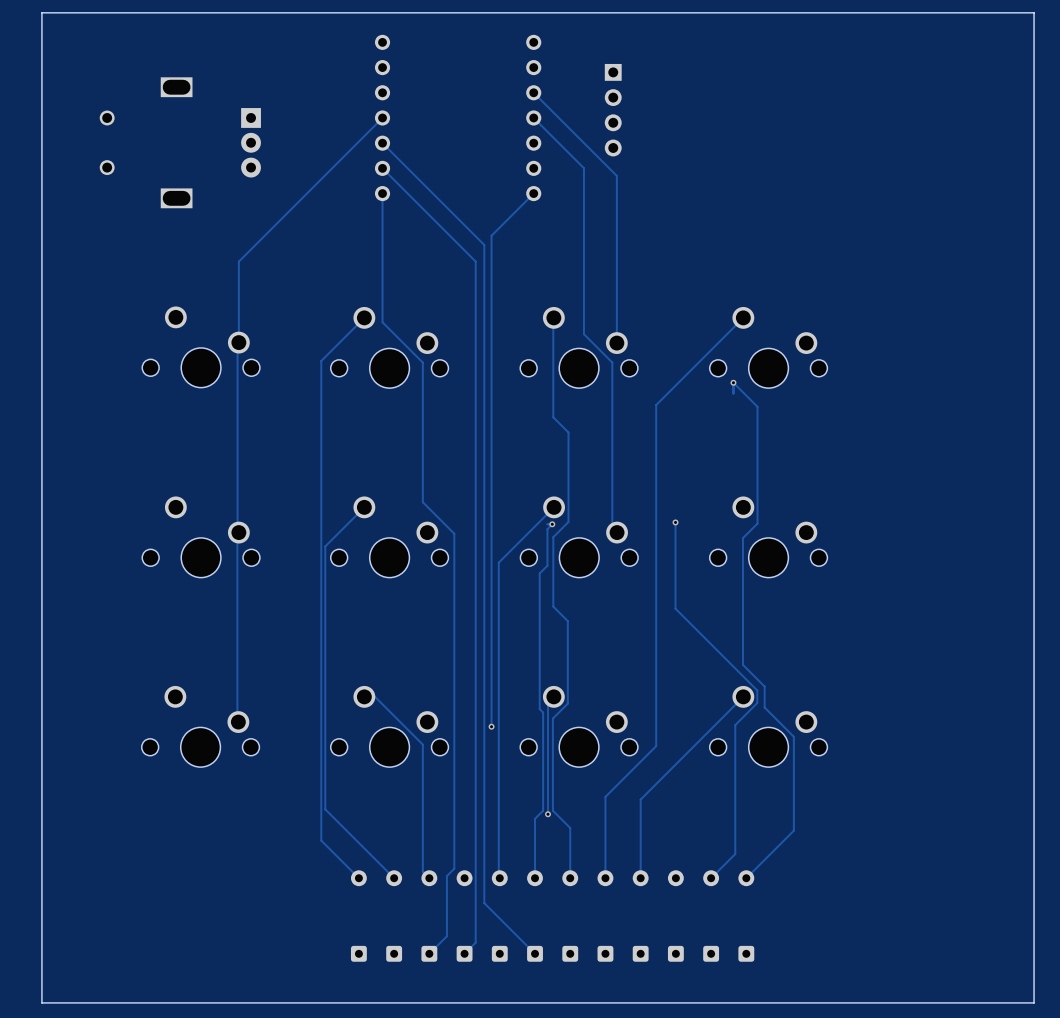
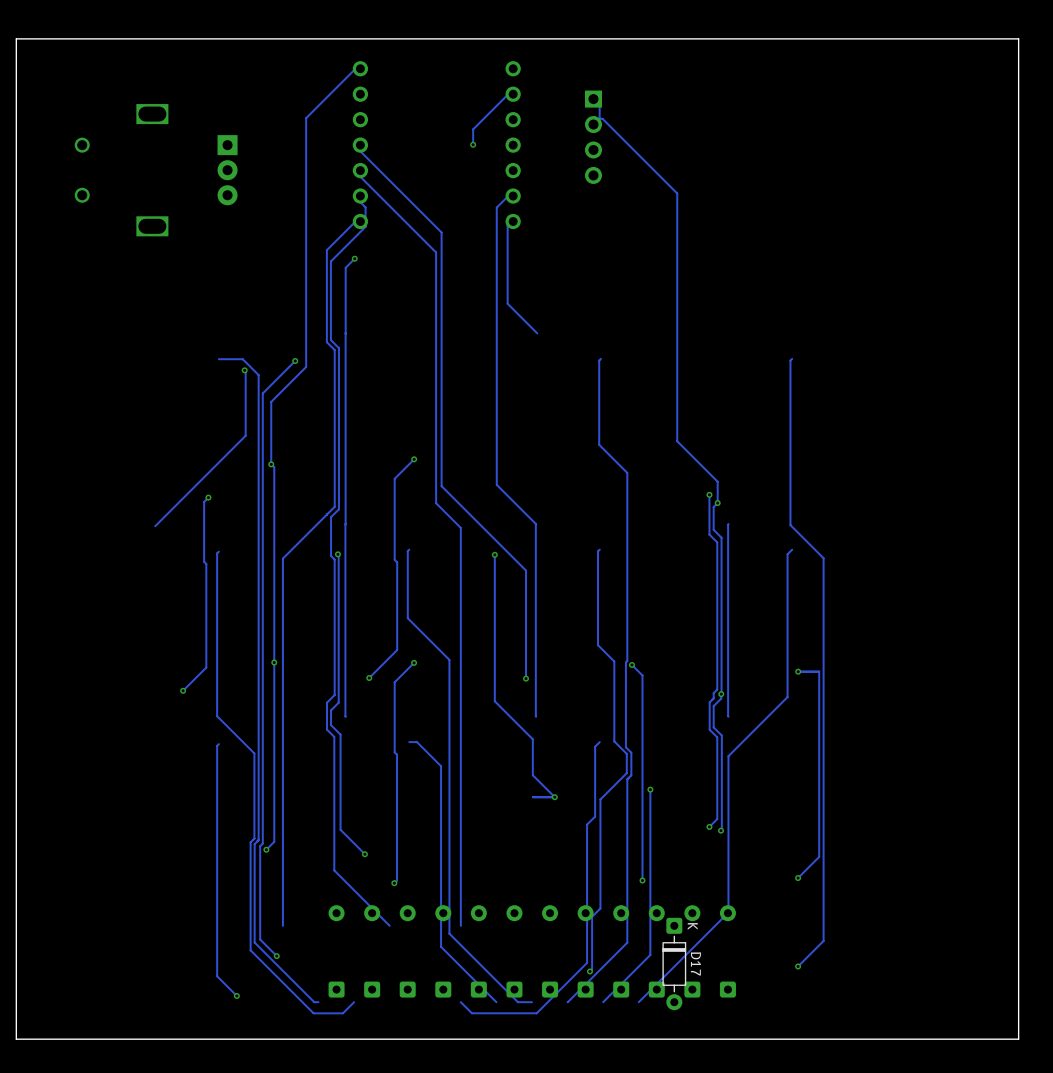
track: none -> (354, 69) (306, 118) (306, 367) (271, 401) (271, 464) (274, 467) (274, 841) (266, 849)
track: none -> (507, 94) (473, 129) (473, 144)
track: none -> (599, 107) (599, 118) (602, 118) (677, 193) (677, 441) (717, 481) (717, 503) (713, 507) (713, 529) (721, 537) (721, 693) (721, 698) (713, 706) (713, 727) (721, 735) (722, 830)
track: (533, 92) (616, 175) (616, 343) -> none
track: (382, 117) (238, 261) (238, 722) -> none
via: none -> (473, 144)
track: (533, 117) (583, 168) (583, 334) (612, 362) (612, 527) (617, 532) -> none
track: none -> (354, 145) (441, 232) (441, 486) (526, 570) (526, 678)
track: none -> (354, 171) (436, 252) (436, 503) (460, 527) (460, 925)
track: (382, 143) (484, 244) (484, 903) (535, 953) -> none
track: (382, 168) (475, 261) (475, 942) (464, 953) -> none
track: none -> (354, 196) (365, 207) (365, 226) (330, 261) (330, 340) (338, 348) (338, 509) (331, 517) (331, 555) (334, 559) (334, 695) (327, 702) (327, 729) (334, 736) (334, 870) (389, 925)
track: none -> (507, 196) (496, 207) (496, 484) (536, 524) (536, 716)
track: (382, 193) (382, 322) (422, 362) (422, 502) (454, 533) (454, 868) (446, 876) (446, 936) (429, 953) -> none
track: (533, 193) (491, 235) (491, 726) -> none
track: none -> (354, 222) (326, 250) (326, 342) (334, 350) (334, 506) (282, 558) (282, 925)
track: none -> (507, 222) (507, 303) (537, 333)
track: none -> (354, 258) (345, 267) (345, 333)
via: none -> (354, 258)
track: none -> (345, 333) (345, 524)
track: (364, 317) (321, 360) (321, 840) (358, 878) -> none
track: (553, 317) (553, 417) (568, 432) (568, 522) (553, 537) (553, 606) (567, 621) (567, 703) (552, 718) (552, 810) (570, 828) (570, 878) -> none
track: (743, 317) (656, 405) (656, 746) (605, 796) (605, 878) -> none
track: none -> (218, 359) (242, 359) (258, 375) (258, 840) (254, 844) (254, 942) (314, 1002) (318, 1002)
track: none -> (600, 358) (599, 360) (599, 444) (627, 472) (625, 747) (631, 752) (631, 775) (627, 779) (627, 942) (567, 1002)
track: none -> (792, 358) (790, 360) (790, 525) (823, 558) (823, 940) (798, 966)
track: none -> (295, 360) (262, 393) (262, 843) (260, 846) (260, 939) (276, 956)
via: none -> (295, 360)
track: none -> (244, 370) (245, 435) (155, 526)
via: none -> (244, 370)
part: (201, 347) -> none
part: (389, 347) -> none
part: (579, 347) -> none
part: (768, 347) -> none
via: (733, 382) -> none
track: (733, 393) (733, 382) (757, 406) (757, 523) (742, 538) (742, 664) (764, 686) (764, 707) (793, 736) (793, 830) (746, 878) -> none
track: none -> (414, 459) (394, 478) (397, 650) (369, 678)
via: none -> (414, 459)
via: none -> (271, 464)
track: none -> (709, 494) (709, 534) (717, 542) (717, 689) (709, 702) (709, 729) (717, 737) (717, 819) (709, 826)
via: none -> (709, 494)
track: none -> (208, 497) (204, 501) (206, 667) (183, 690)
via: none -> (208, 497)
via: none -> (717, 503)
track: none -> (345, 524) (345, 716)
track: none -> (728, 524) (728, 716)
track: (364, 507) (325, 546) (325, 809) (394, 878) -> none
track: (554, 507) (498, 562) (499, 878) -> none
track: none -> (409, 549) (407, 618) (449, 659) (449, 933) (517, 1002) (532, 1002)
track: none -> (599, 549) (598, 551) (598, 645) (614, 661) (614, 741) (626, 753) (626, 773) (600, 799) (600, 908) (592, 916) (592, 969) (589, 971)
track: none -> (792, 549) (787, 554) (787, 697) (728, 756) (728, 912) (638, 1002)
track: none -> (218, 551) (217, 553) (217, 716) (254, 753) (254, 838) (250, 842) (250, 950) (313, 1013) (342, 1013) (354, 1002)
track: (675, 522) (675, 608) (757, 690) (757, 703) (735, 725) (735, 854) (711, 878) -> none
via: (675, 522) -> none
via: none -> (337, 554)
track: none -> (338, 554) (338, 702) (331, 710) (331, 725) (340, 734) (340, 829) (364, 854)
track: none -> (494, 554) (494, 701) (532, 739) (532, 775) (554, 797) (532, 797)
track: (547, 524) (552, 524) (547, 529) (547, 565) (539, 573) (539, 709) (543, 712) (543, 810) (535, 818) (535, 878) -> none
via position: (552, 524) -> (494, 554)
part: (201, 537) -> none
part: (389, 537) -> none
part: (579, 537) -> none
part: (768, 537) -> none
via: none -> (274, 662)
track: none -> (414, 662) (394, 682) (397, 880) (394, 883)
via: none -> (414, 662)
track: none -> (631, 664) (642, 675) (642, 880)
via: none -> (631, 664)
track: none -> (798, 671) (819, 671) (819, 856) (798, 878)
via: none -> (798, 671)
via: none -> (369, 678)
via: none -> (526, 678)
via: none -> (183, 690)
via: none -> (721, 694)
track: (364, 696) (375, 696) (422, 744) (422, 871) (429, 878) -> none
track: (553, 696) (548, 702) (548, 814) -> none
track: (743, 696) (640, 799) (640, 878) -> none
track: none -> (409, 742) (416, 742) (441, 766) (441, 946) (496, 1002)
track: none -> (599, 742) (595, 746) (595, 816) (587, 824) (587, 962) (536, 1013) (471, 1013) (460, 1002)
track: none -> (218, 744) (217, 745) (217, 976) (236, 995)
part: (200, 726) -> none
part: (389, 726) -> none
via: (491, 726) -> none
part: (579, 726) -> none
part: (768, 726) -> none
track: none -> (650, 789) (650, 954) (603, 1002)
via: none -> (650, 789)
via: none -> (554, 797)
via: none -> (709, 826)
via: none -> (721, 830)
via: (548, 814) -> none
via: none -> (266, 849)
via: none -> (364, 854)
via: none -> (798, 878)
via: none -> (642, 880)
via: none -> (394, 883)
via: none -> (276, 956)
D17: none -> (674, 964)
via: none -> (798, 966)
via: none -> (589, 971)
via: none -> (236, 995)

